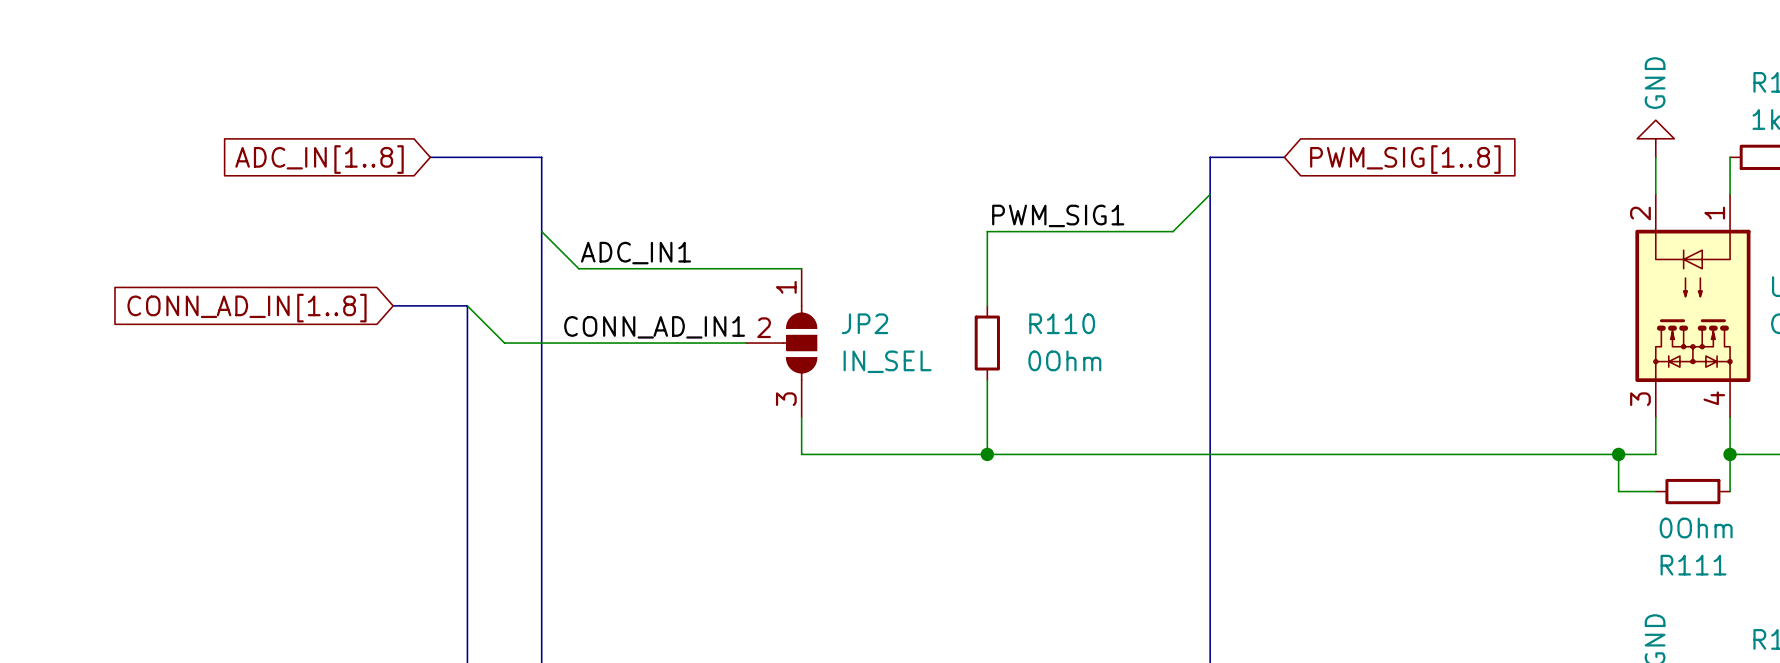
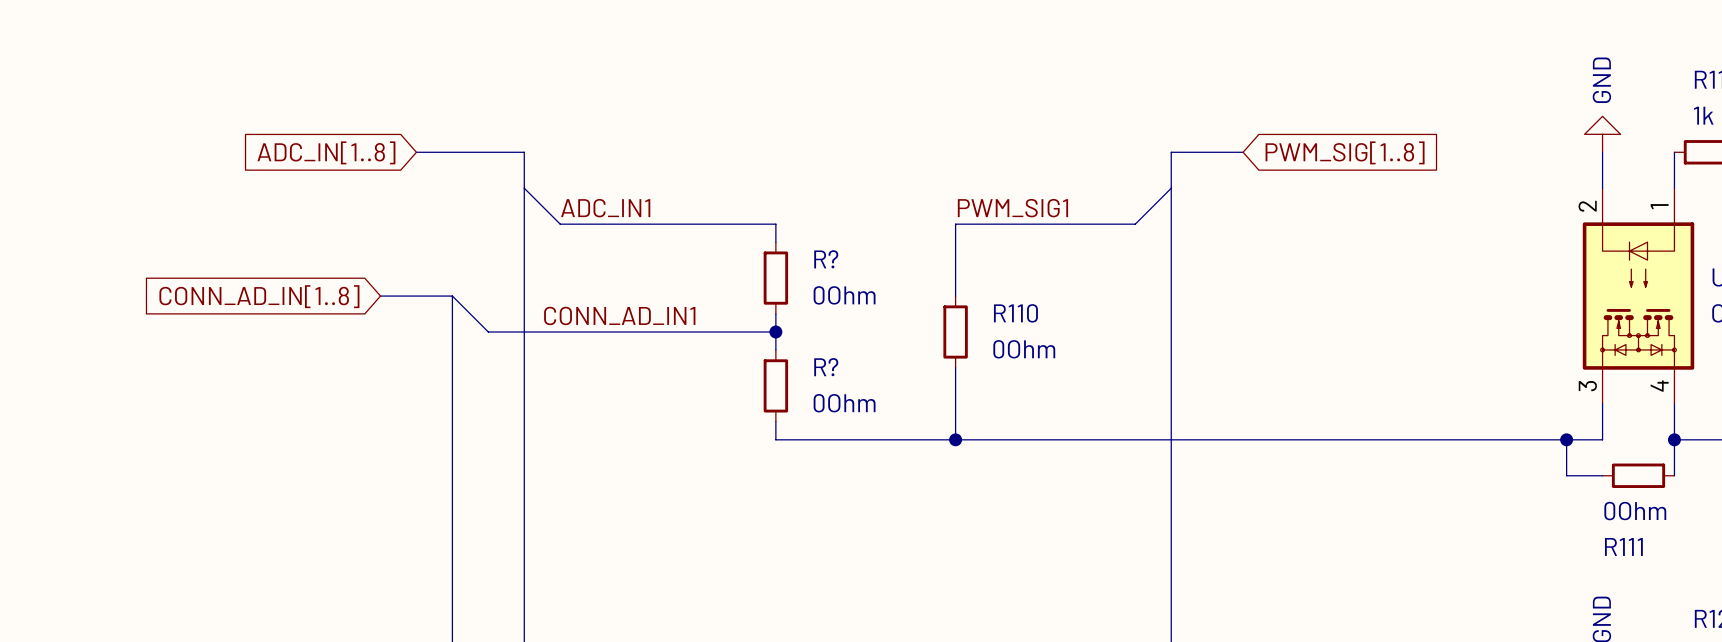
wire: none -> (524, 188) (560, 224) (775, 224) (775, 242)
wire: (541, 231) (578, 268) (801, 268) -> none
label position: ADC_IN1 (636, 253) -> ADC_IN1 (605, 208)
R?: none -> 0Ohm (775, 278)
JP2: IN_SEL (781, 343) -> none
junction: none -> (775, 331)
R?: none -> 0Ohm (775, 385)

